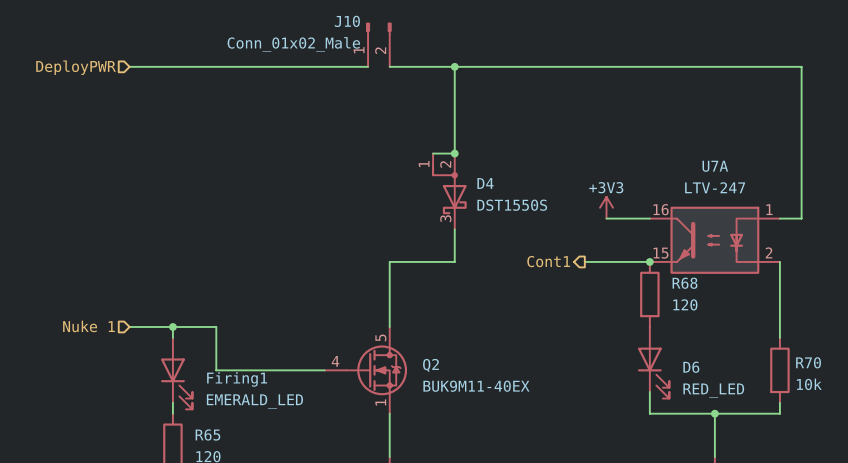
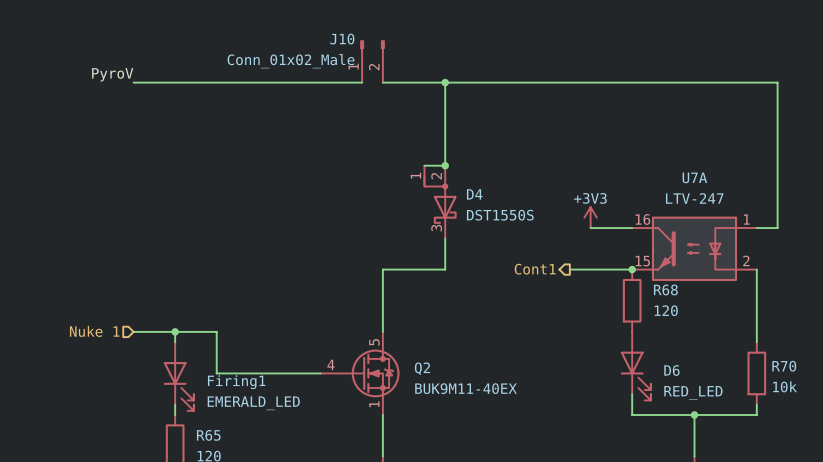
label: none -> PyroV (112, 74)
hierarchical label: DeployPWR (76, 67) -> none

